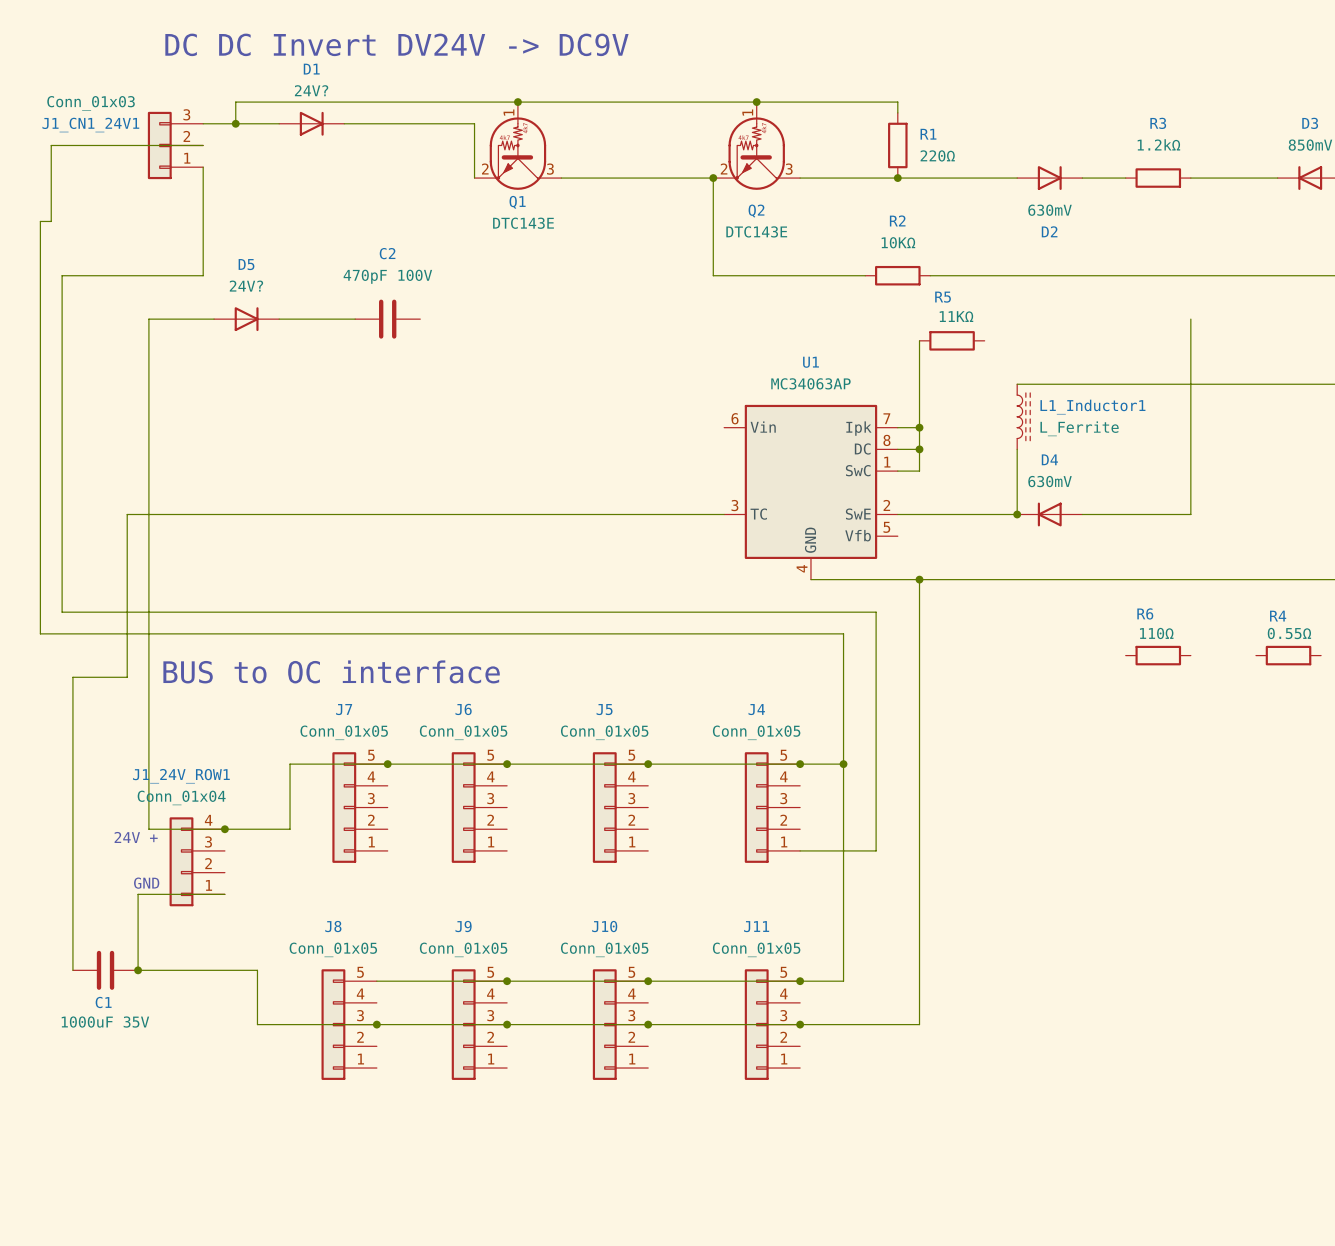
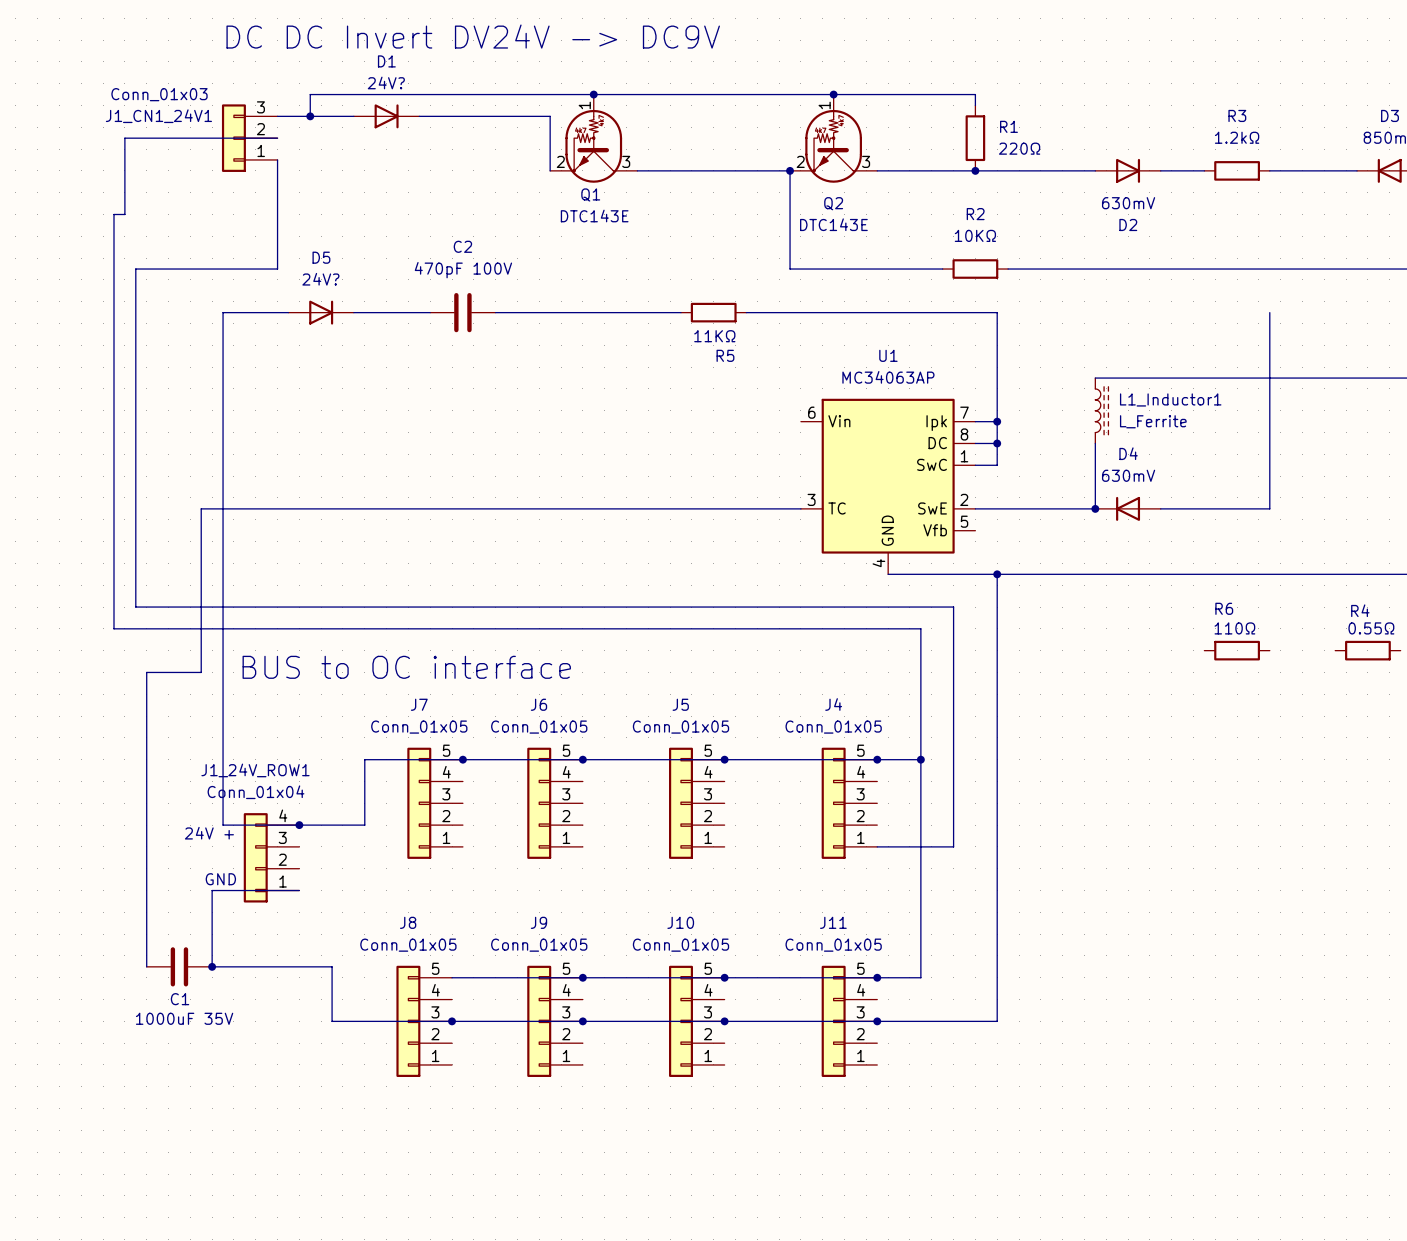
R5 name position: R5 (943, 297) -> R5 (725, 355)
R5 value position: 11KΩ (956, 316) -> 11KΩ (714, 336)
wire: none -> (495, 312) (680, 312)
wire: none -> (746, 312) (997, 312) (997, 334)
R5 position: (952, 340) -> (713, 312)

